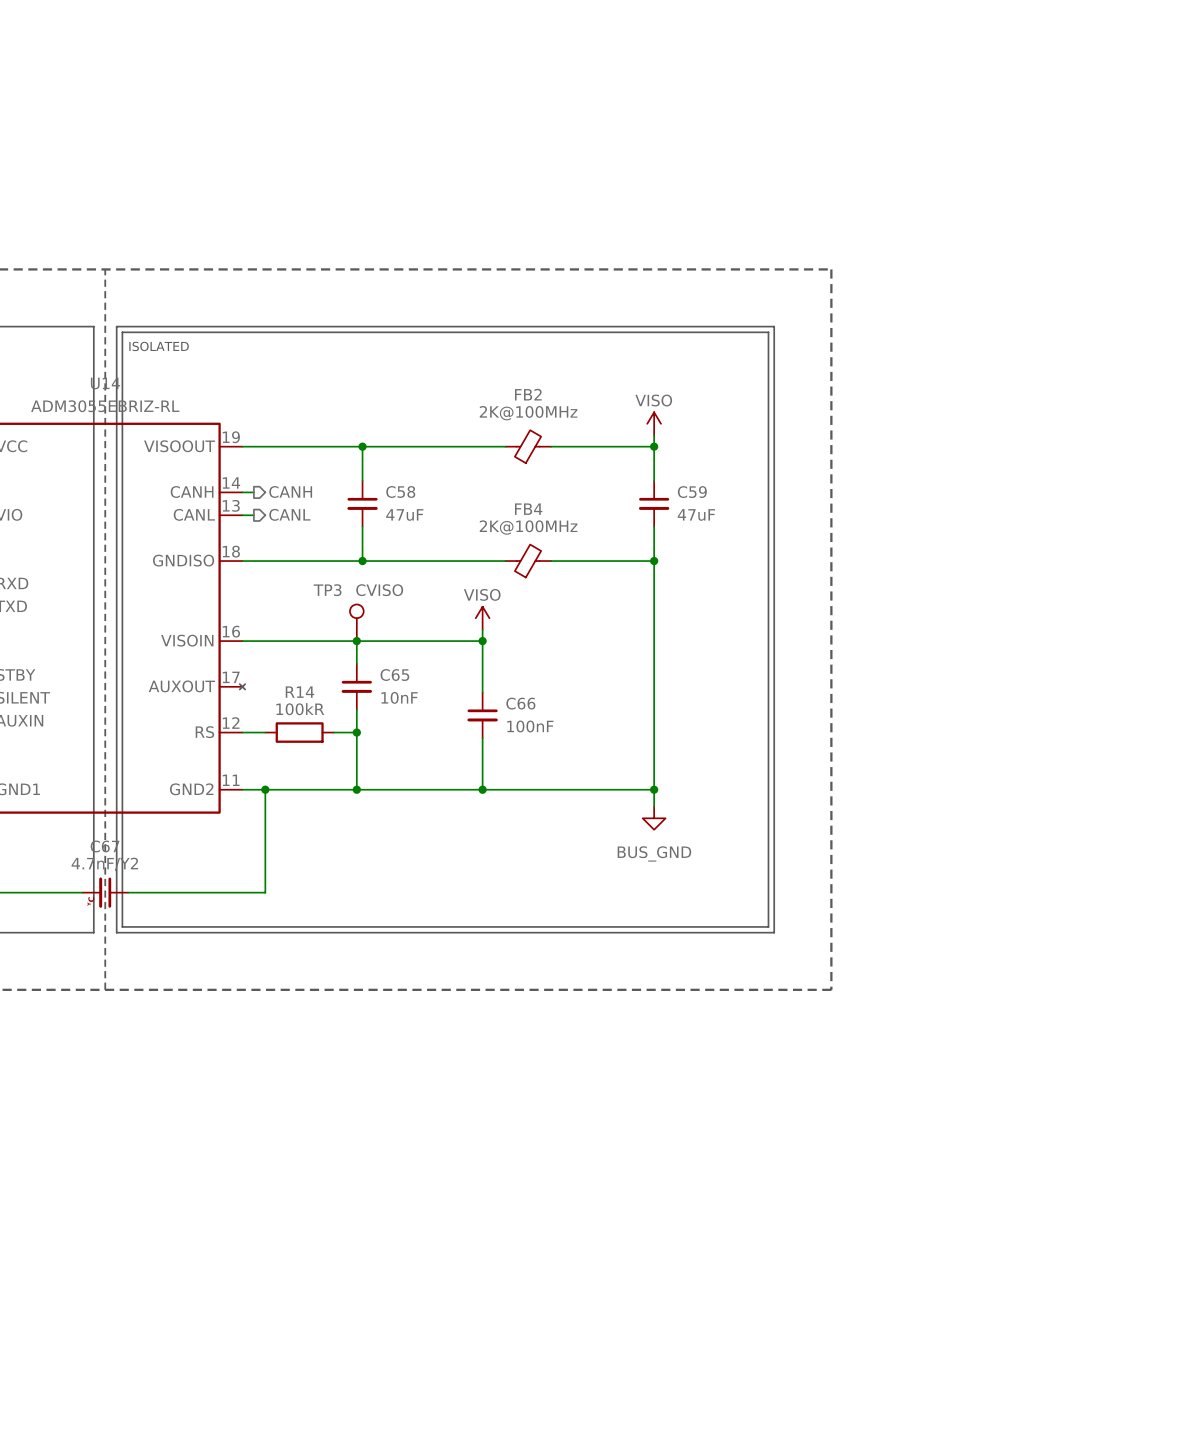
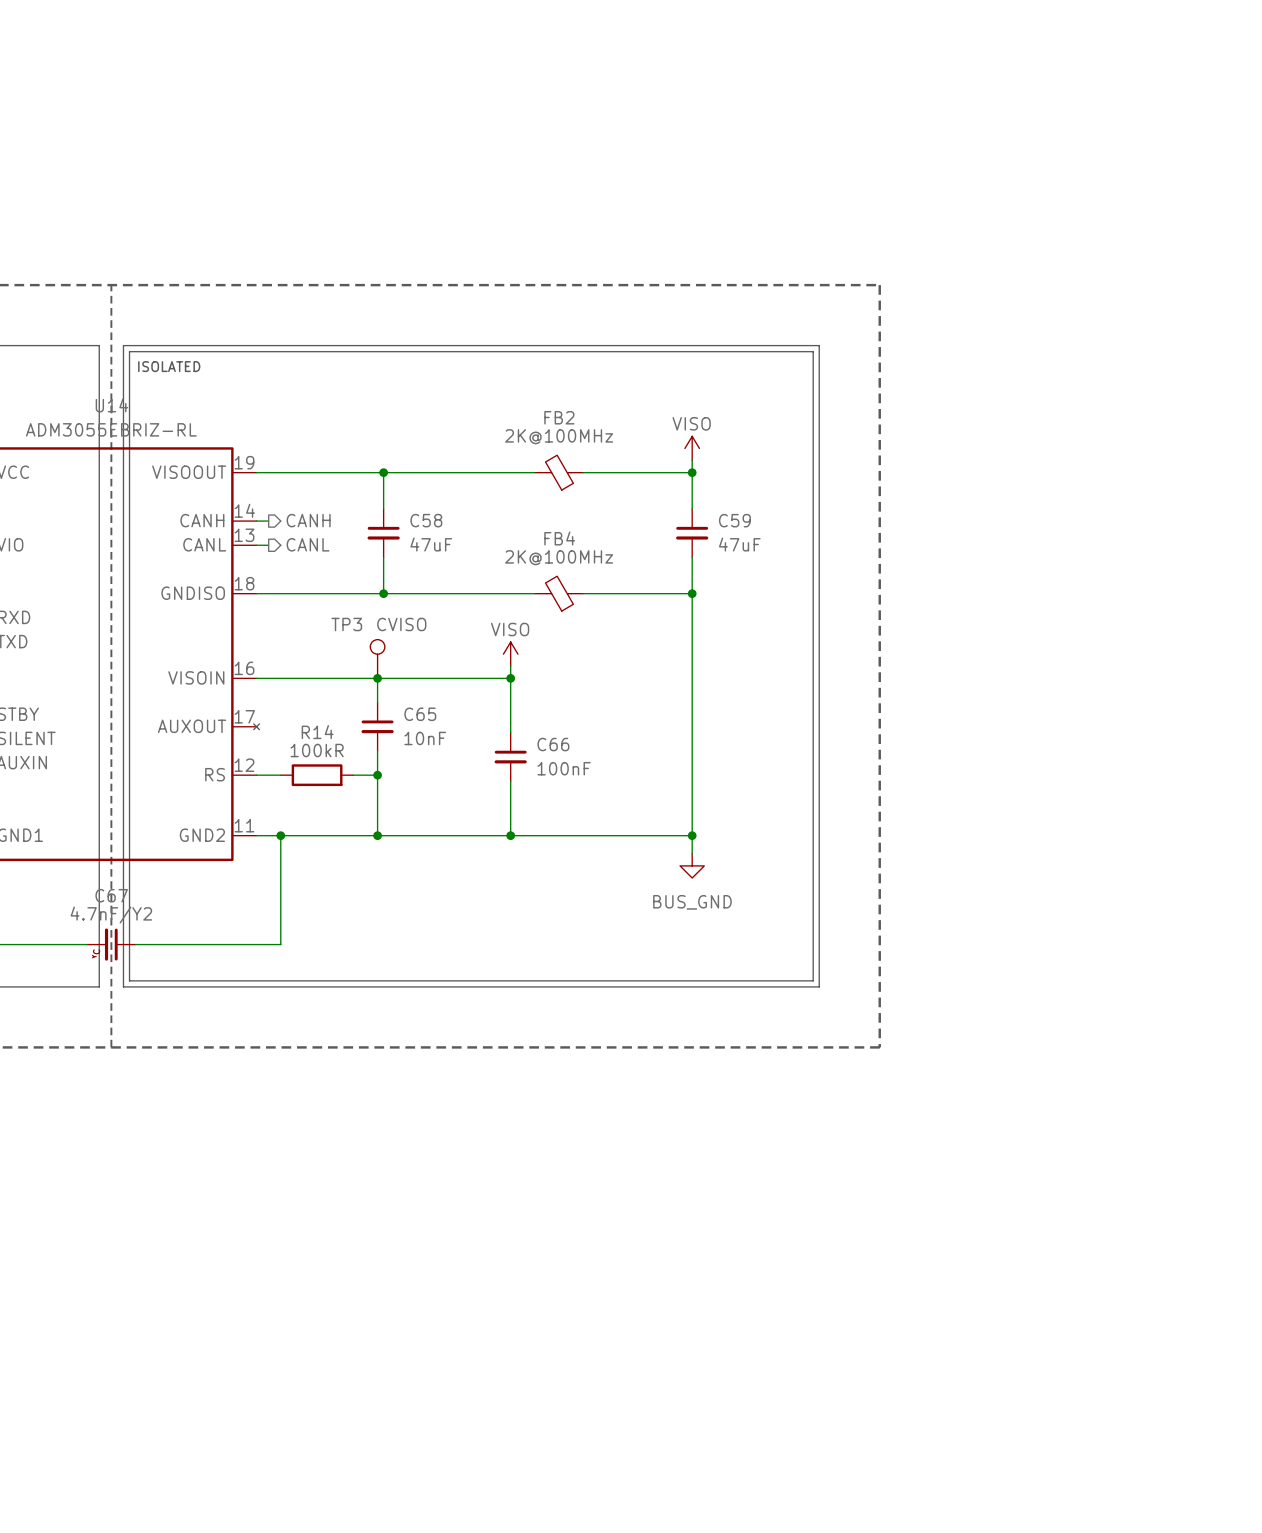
FB2 flip: as is (528, 446) -> left-right (559, 472)
FB4 flip: as is (528, 561) -> left-right (559, 593)

